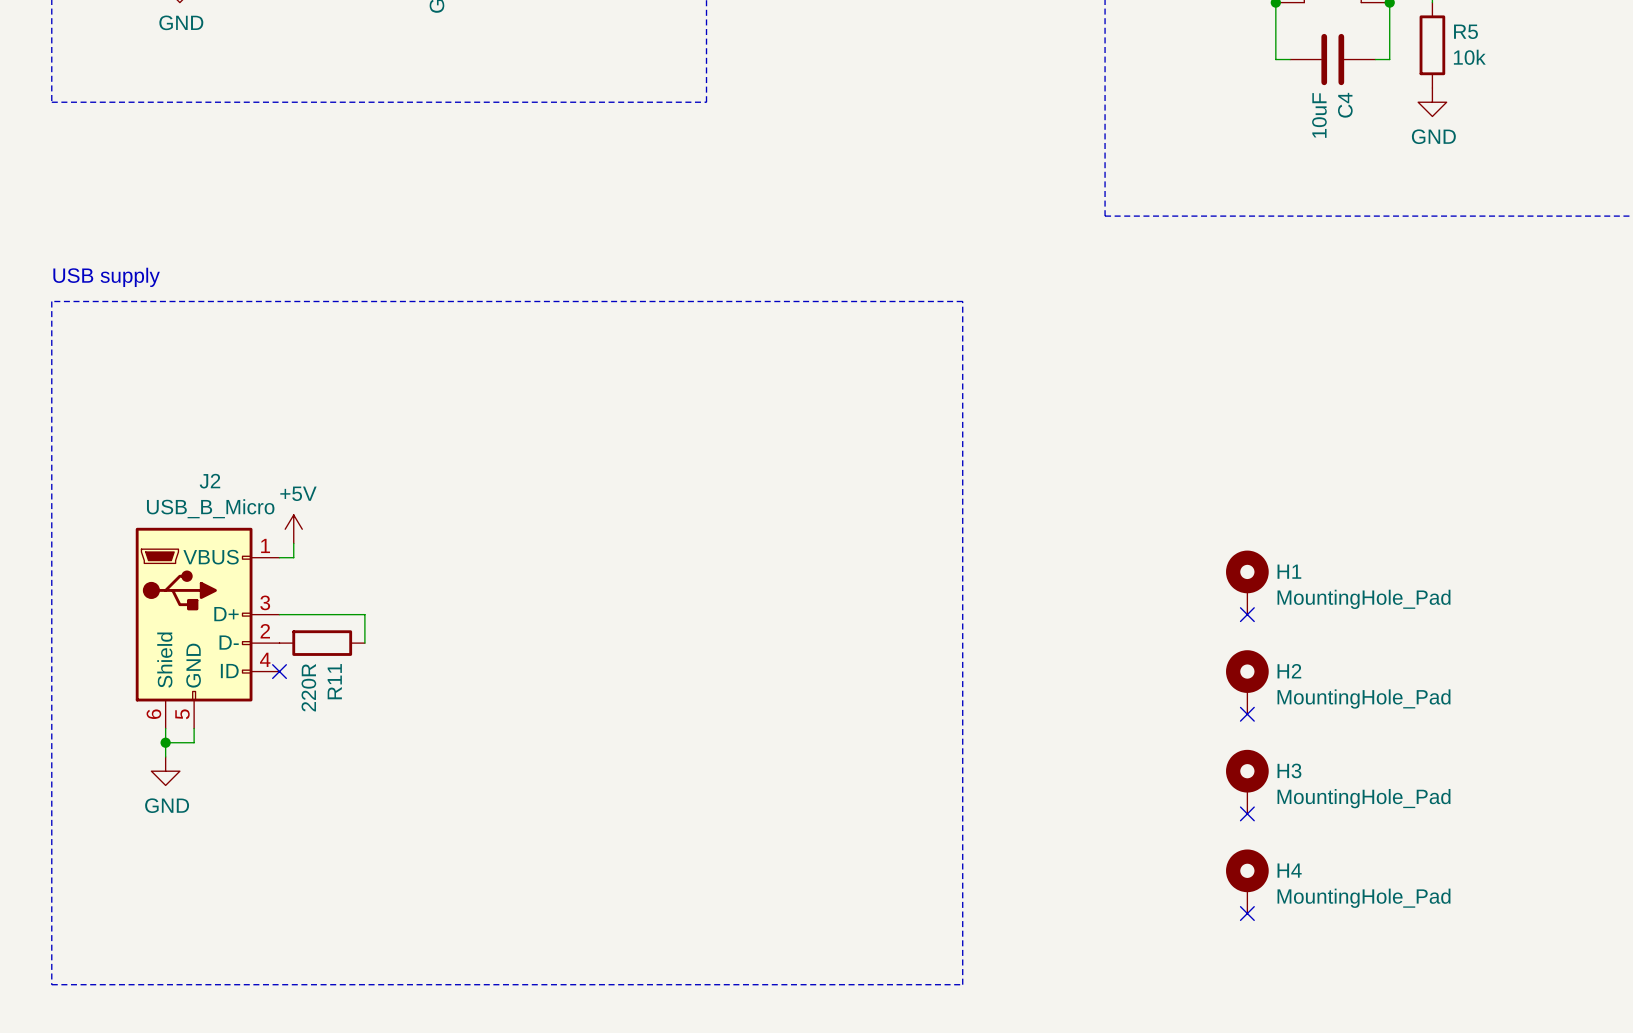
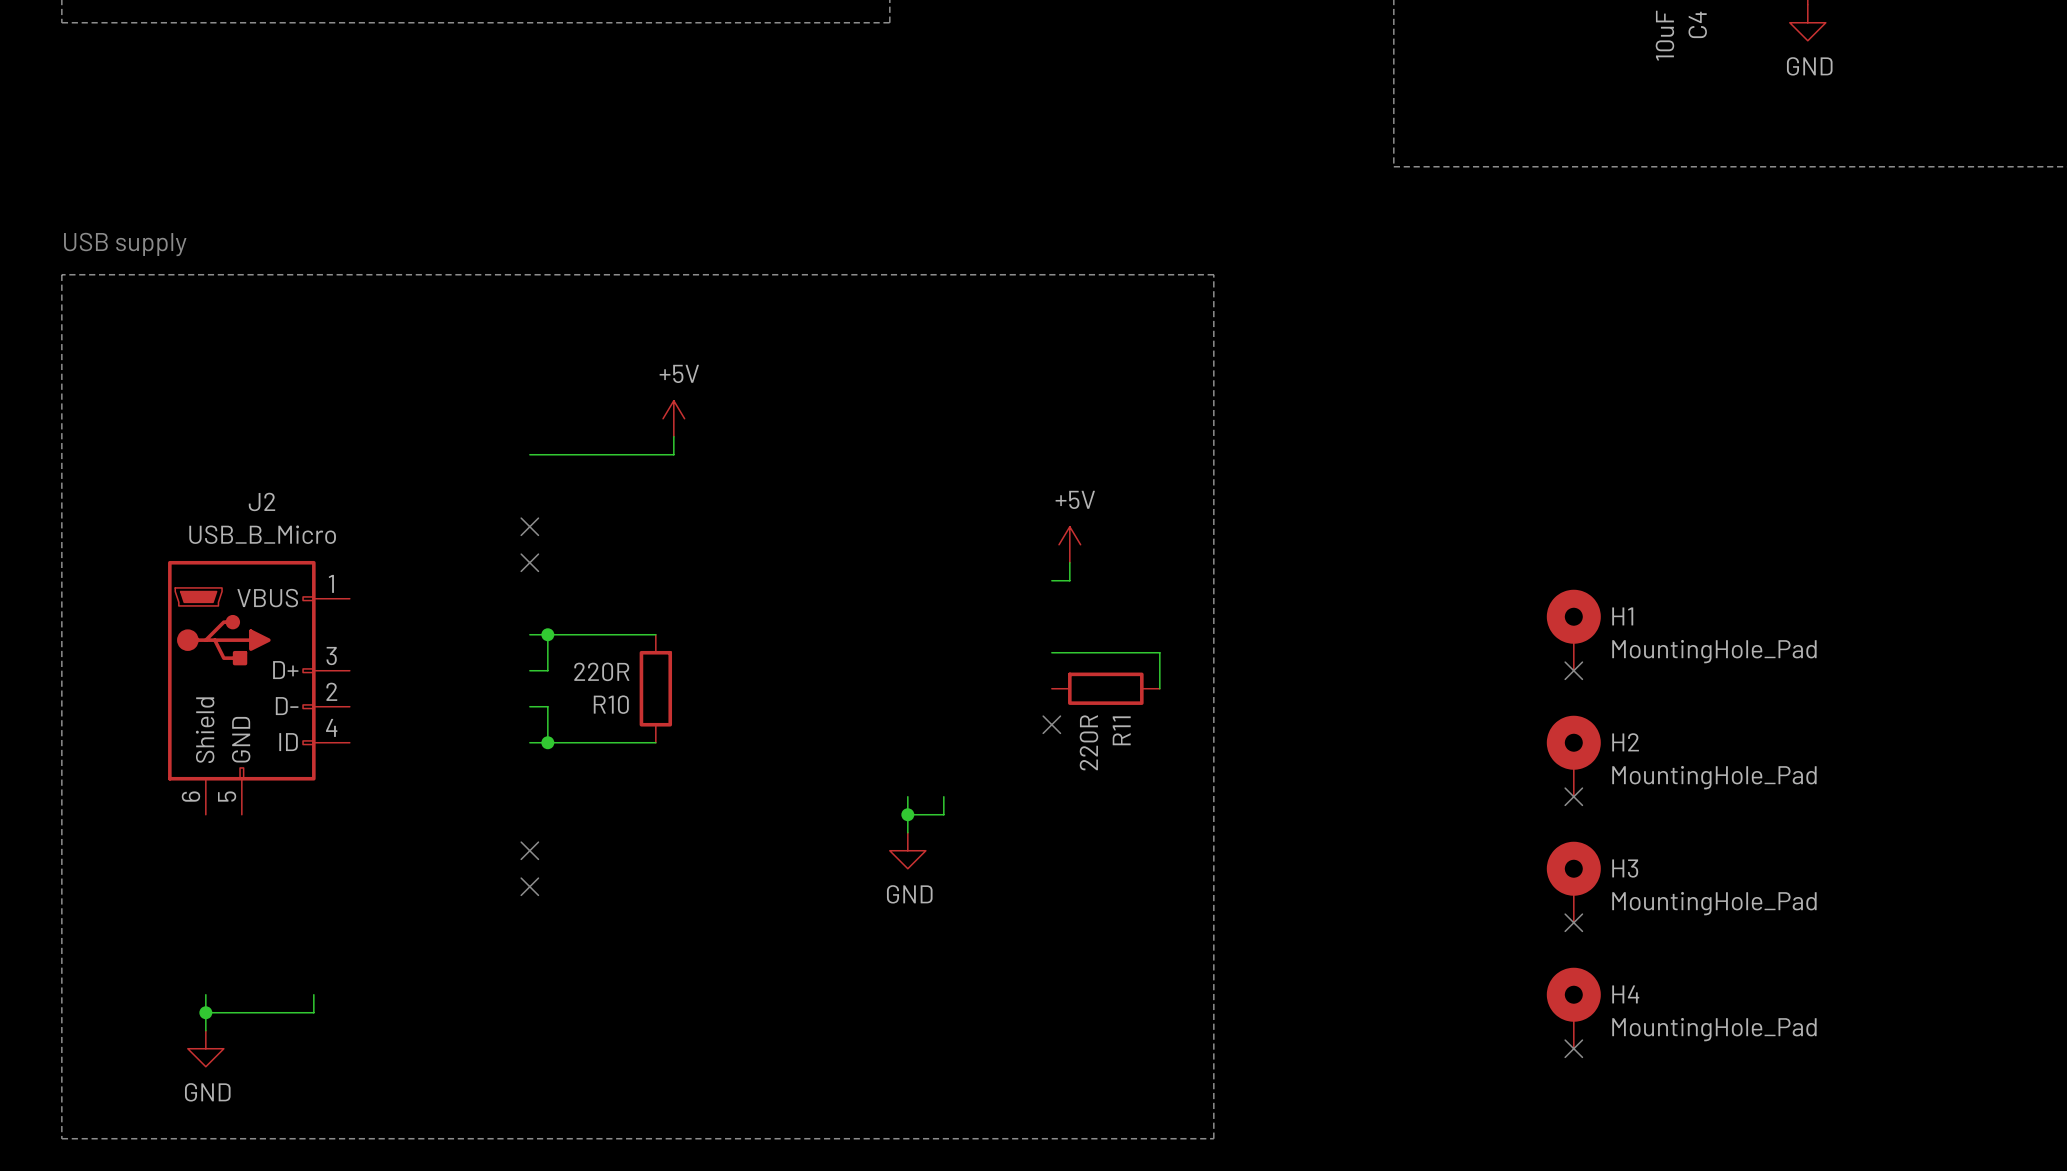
wire: none -> (673, 436) (673, 454) (529, 454)
no-connect mark: none -> (529, 526)
power symbol: none -> +5V (1069, 544)
power symbol position: +5V (293, 529) -> +5V (673, 418)
no-connect mark: none -> (529, 562)
wire: none -> (1069, 562) (1069, 580) (1051, 580)
wire: (293, 543) (293, 557) (279, 557) -> none
wire: none -> (529, 634) (655, 634)
wire: none -> (547, 634) (547, 670) (529, 670)
junction: none -> (547, 634)
wire: none -> (1051, 652) (1159, 652) (1159, 688)
wire: (279, 614) (364, 614) (364, 643) -> none
R10: none -> 220R (655, 688)
R11 position: (322, 643) -> (1105, 688)
wire: none -> (529, 706) (547, 706) (547, 742)
no-connect mark: none -> (1051, 724)
no-connect mark: (279, 671) -> none
wire: none -> (529, 742) (655, 742)
junction: none -> (547, 742)
wire: none -> (907, 796) (907, 832)
wire: none -> (943, 796) (943, 814) (907, 814)
wire: (165, 728) (165, 756) -> (205, 994) (205, 1030)
wire: (194, 728) (194, 742) (165, 742) -> none
junction: none -> (907, 814)
junction: (165, 742) -> none
no-connect mark: none -> (529, 850)
power symbol: none -> GND (907, 850)
power symbol position: GND (165, 771) -> GND (205, 1048)
no-connect mark: none -> (529, 886)
wire: none -> (313, 994) (313, 1012) (205, 1012)
junction: none -> (205, 1012)

